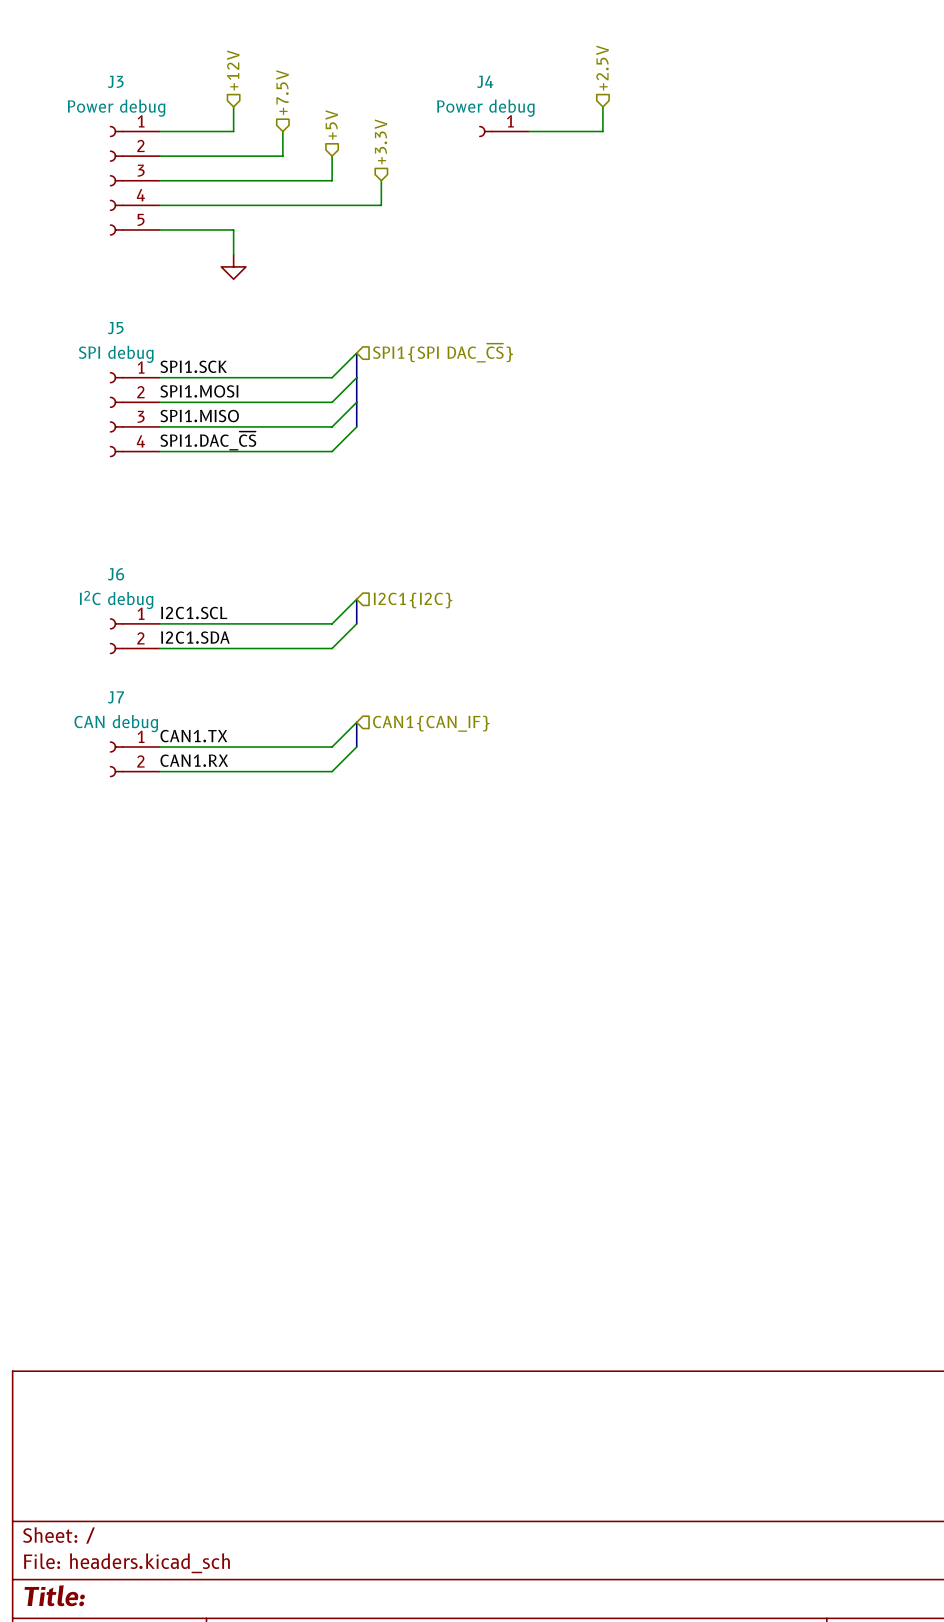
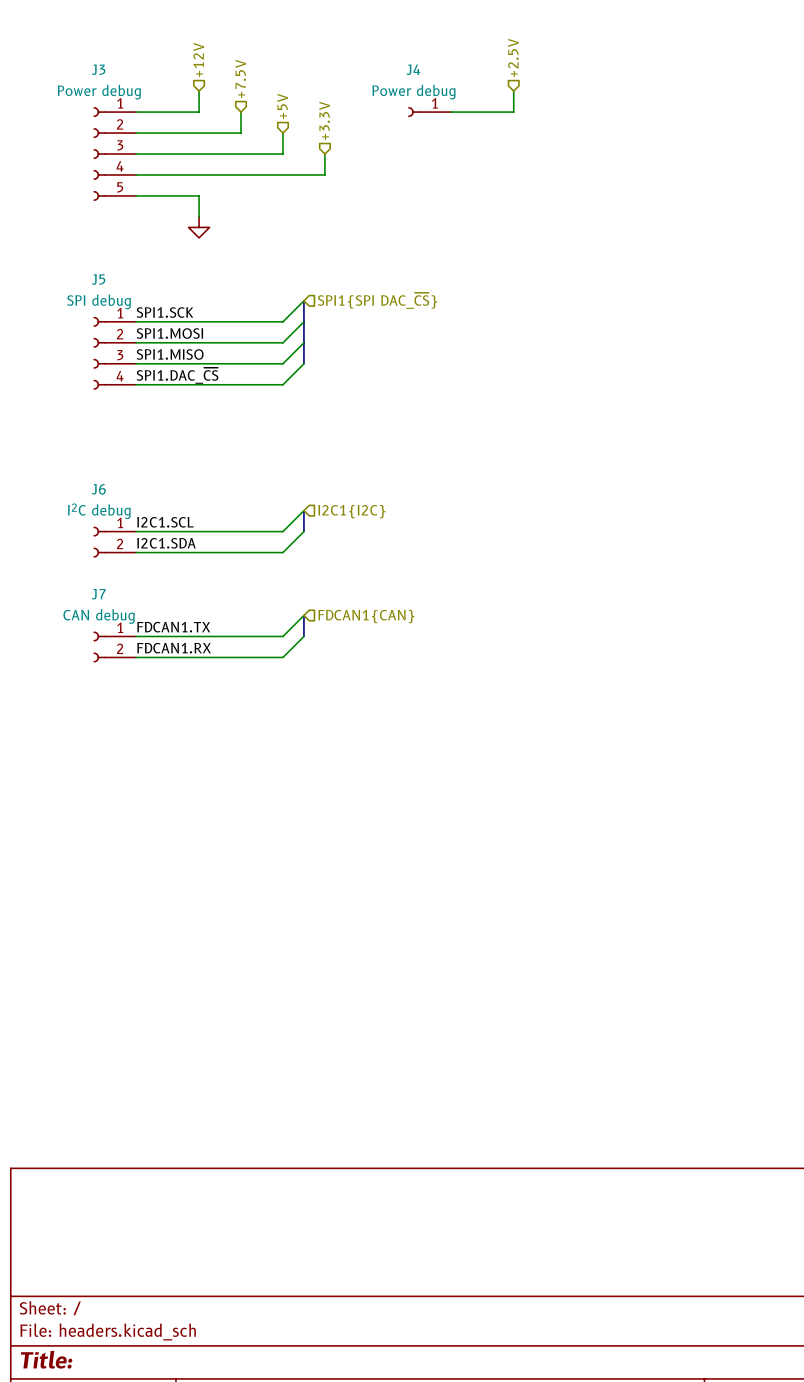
hierarchical label: CAN1{CAN_IF} (431, 723) -> FDCAN1{CAN} (366, 616)
label: CAN1.TX (193, 736) -> FDCAN1.TX (173, 627)
label: CAN1.RX (194, 760) -> FDCAN1.RX (174, 648)

